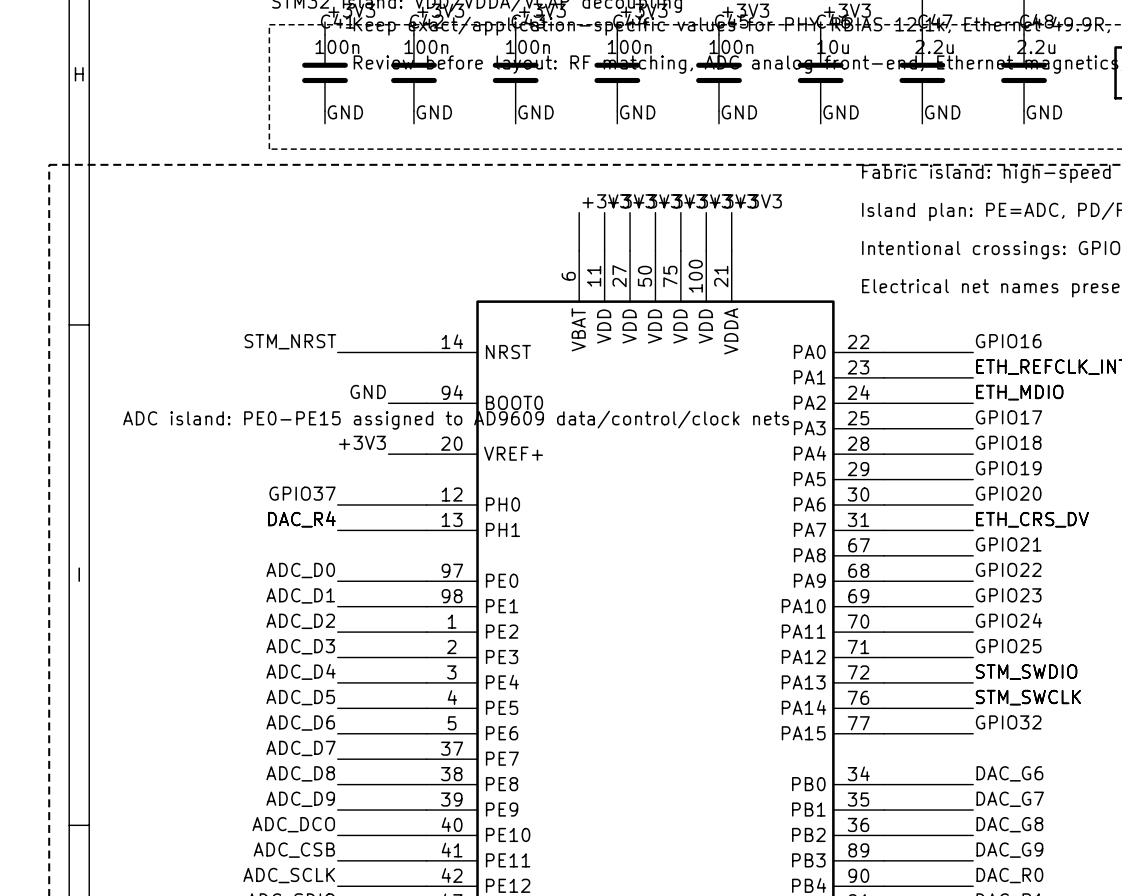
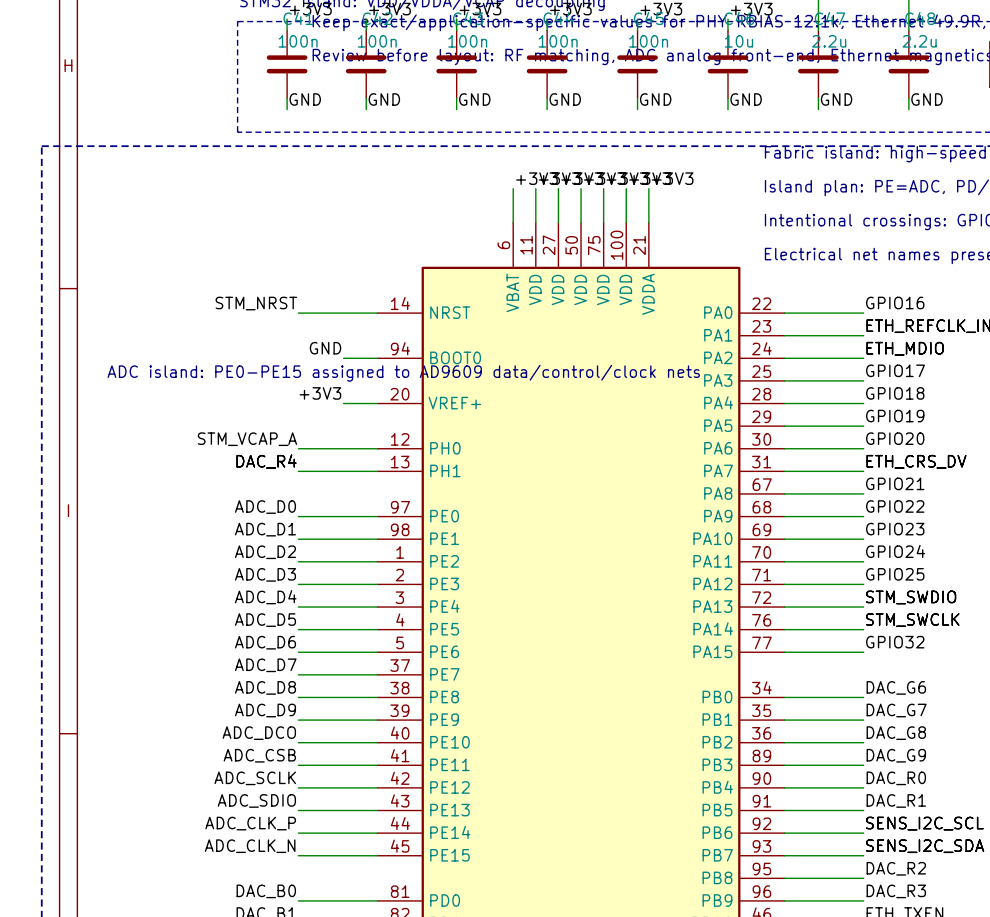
label: GPIO37 (302, 493) -> STM_VCAP_A (247, 439)

